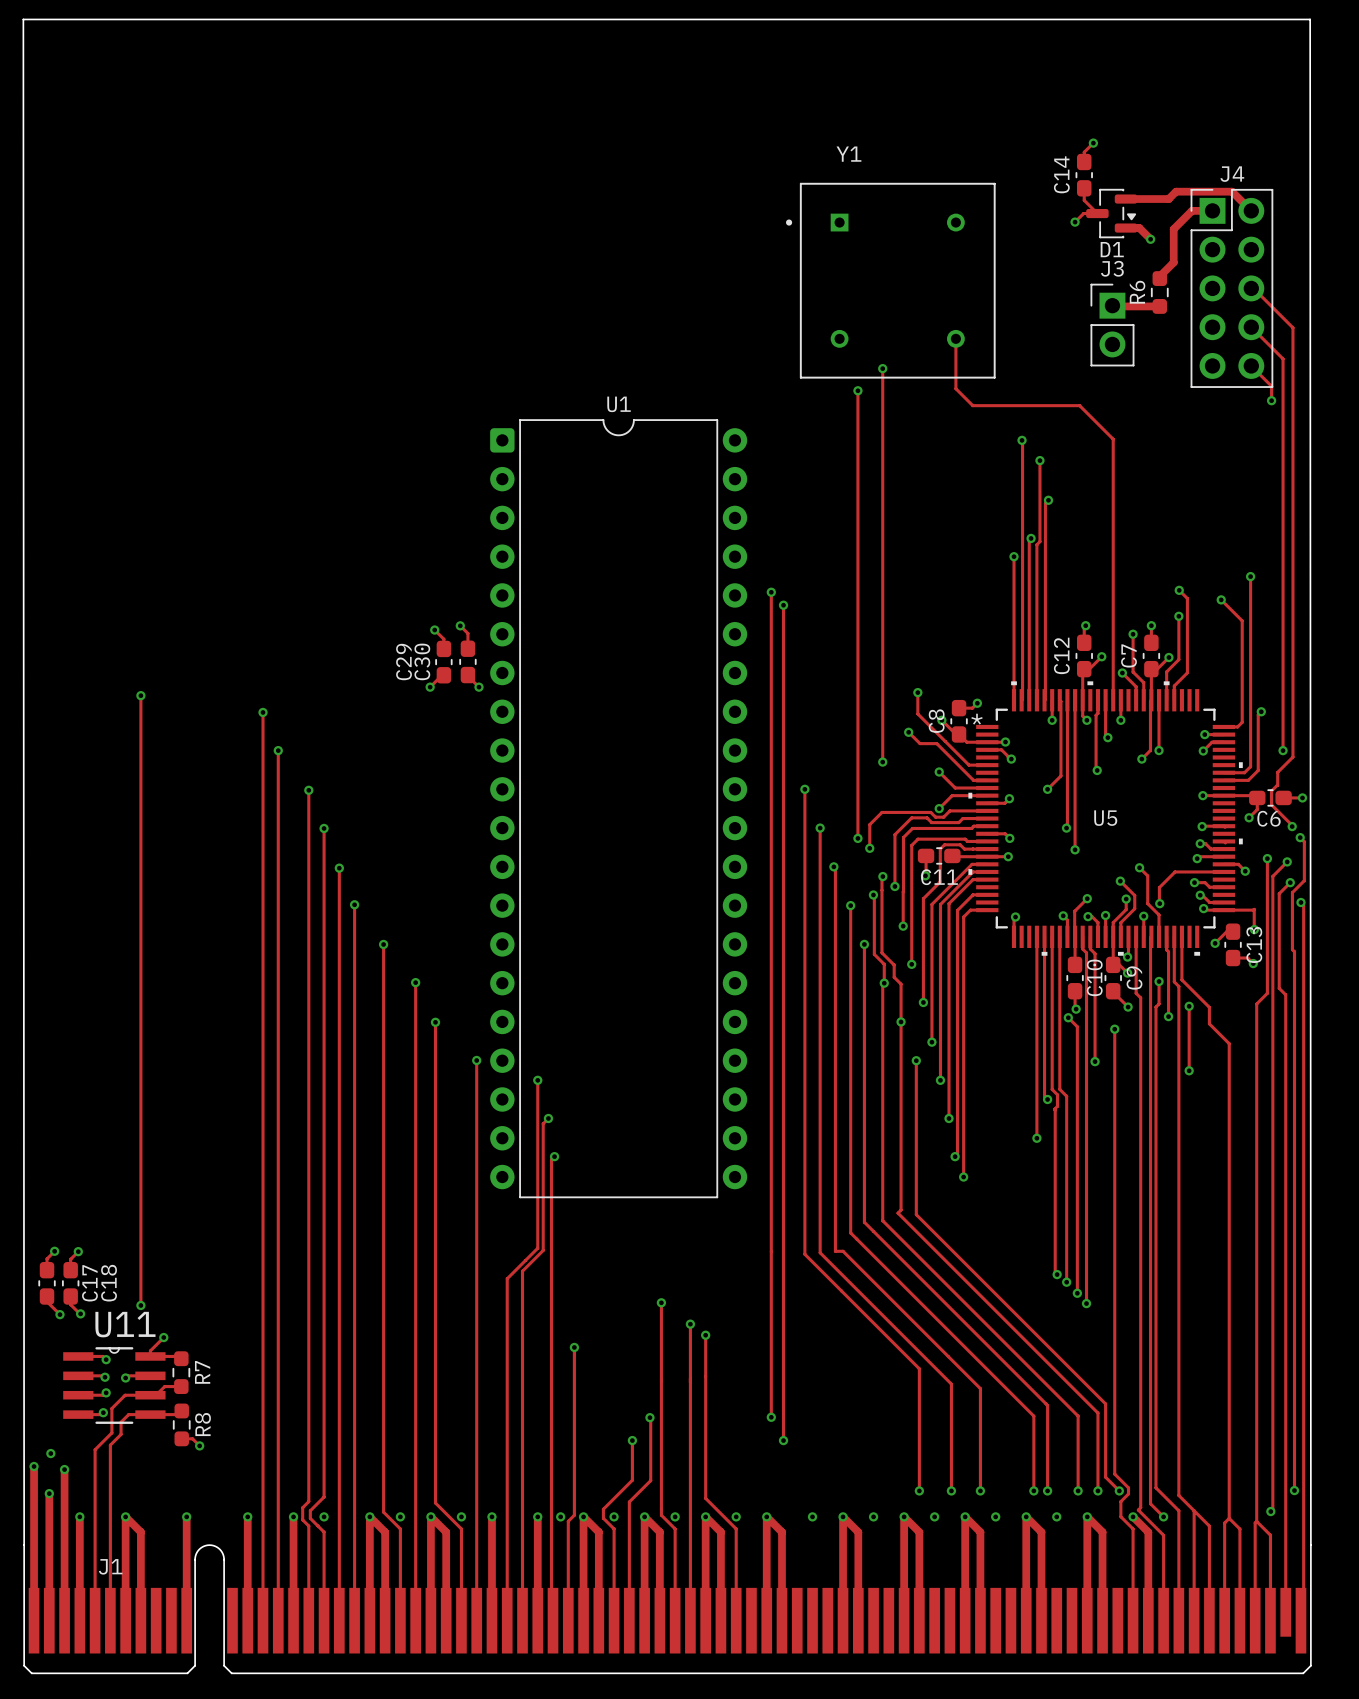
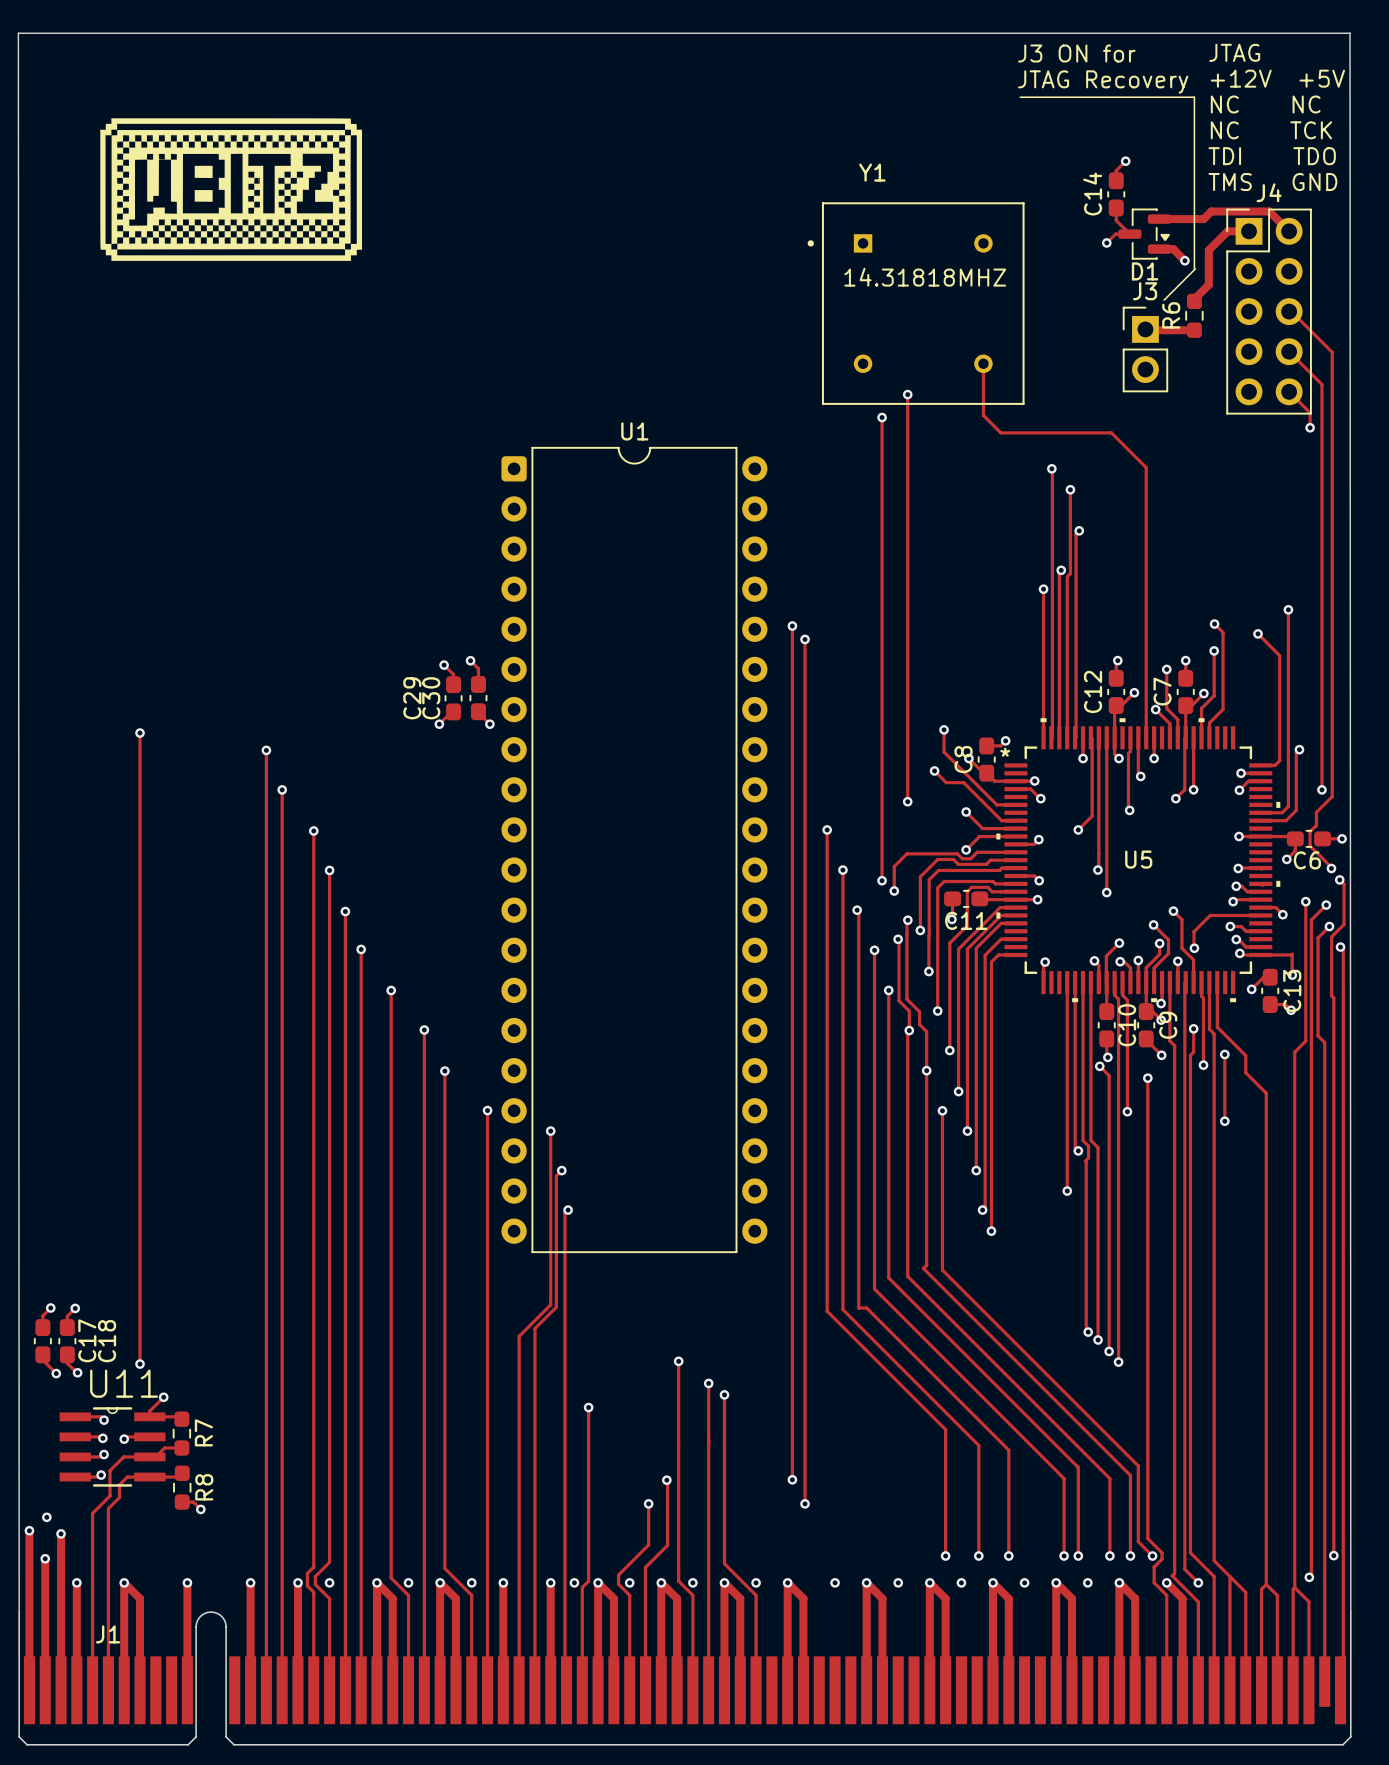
text: none -> J3 ON for (1076, 53)
text: none -> JTAG (1234, 52)
text: none -> +12V +5V (1277, 78)
text: none -> JTAG Recovery (1103, 82)
line: none -> (1020, 97) (1194, 97) (1194, 269)
text: none -> NC NC (1265, 104)
drawing: none -> [100, 118, 363, 261]
text: none -> NC TCK (1271, 130)
text: none -> TDI TDO (1272, 156)
text: none -> TMS GND (1272, 182)
line: none -> (1195, 269) (1164, 300)
text: none -> 14.31818MHZ (925, 277)

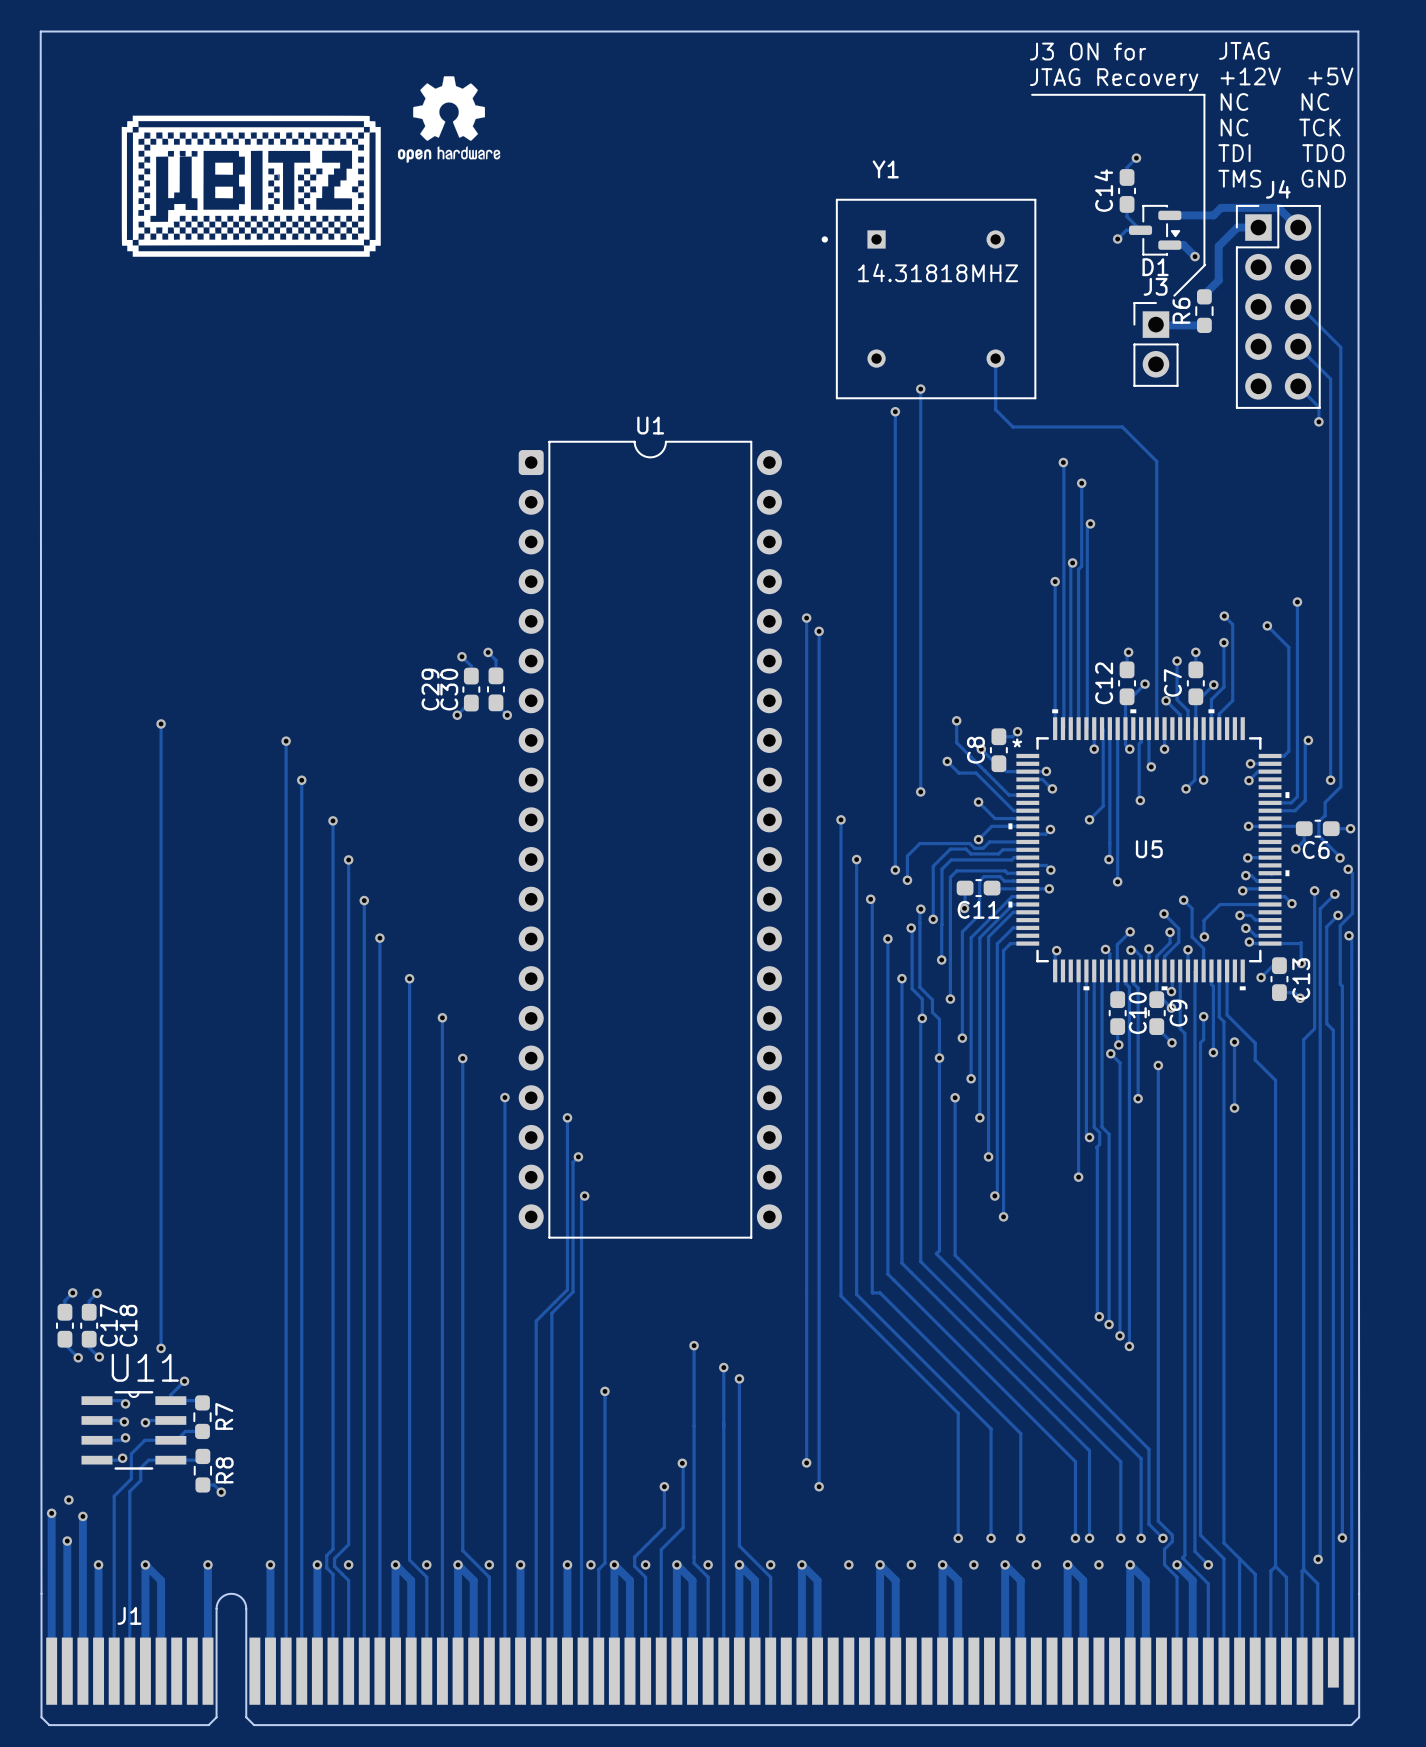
drawing: none -> [397, 76, 501, 163]

